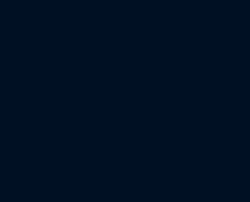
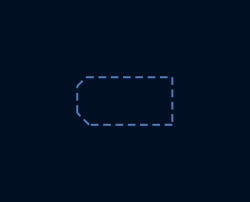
zone outline: none -> (172, 77) (86, 77) (77, 86) (77, 112) (89, 124) (172, 124) (172, 77)

